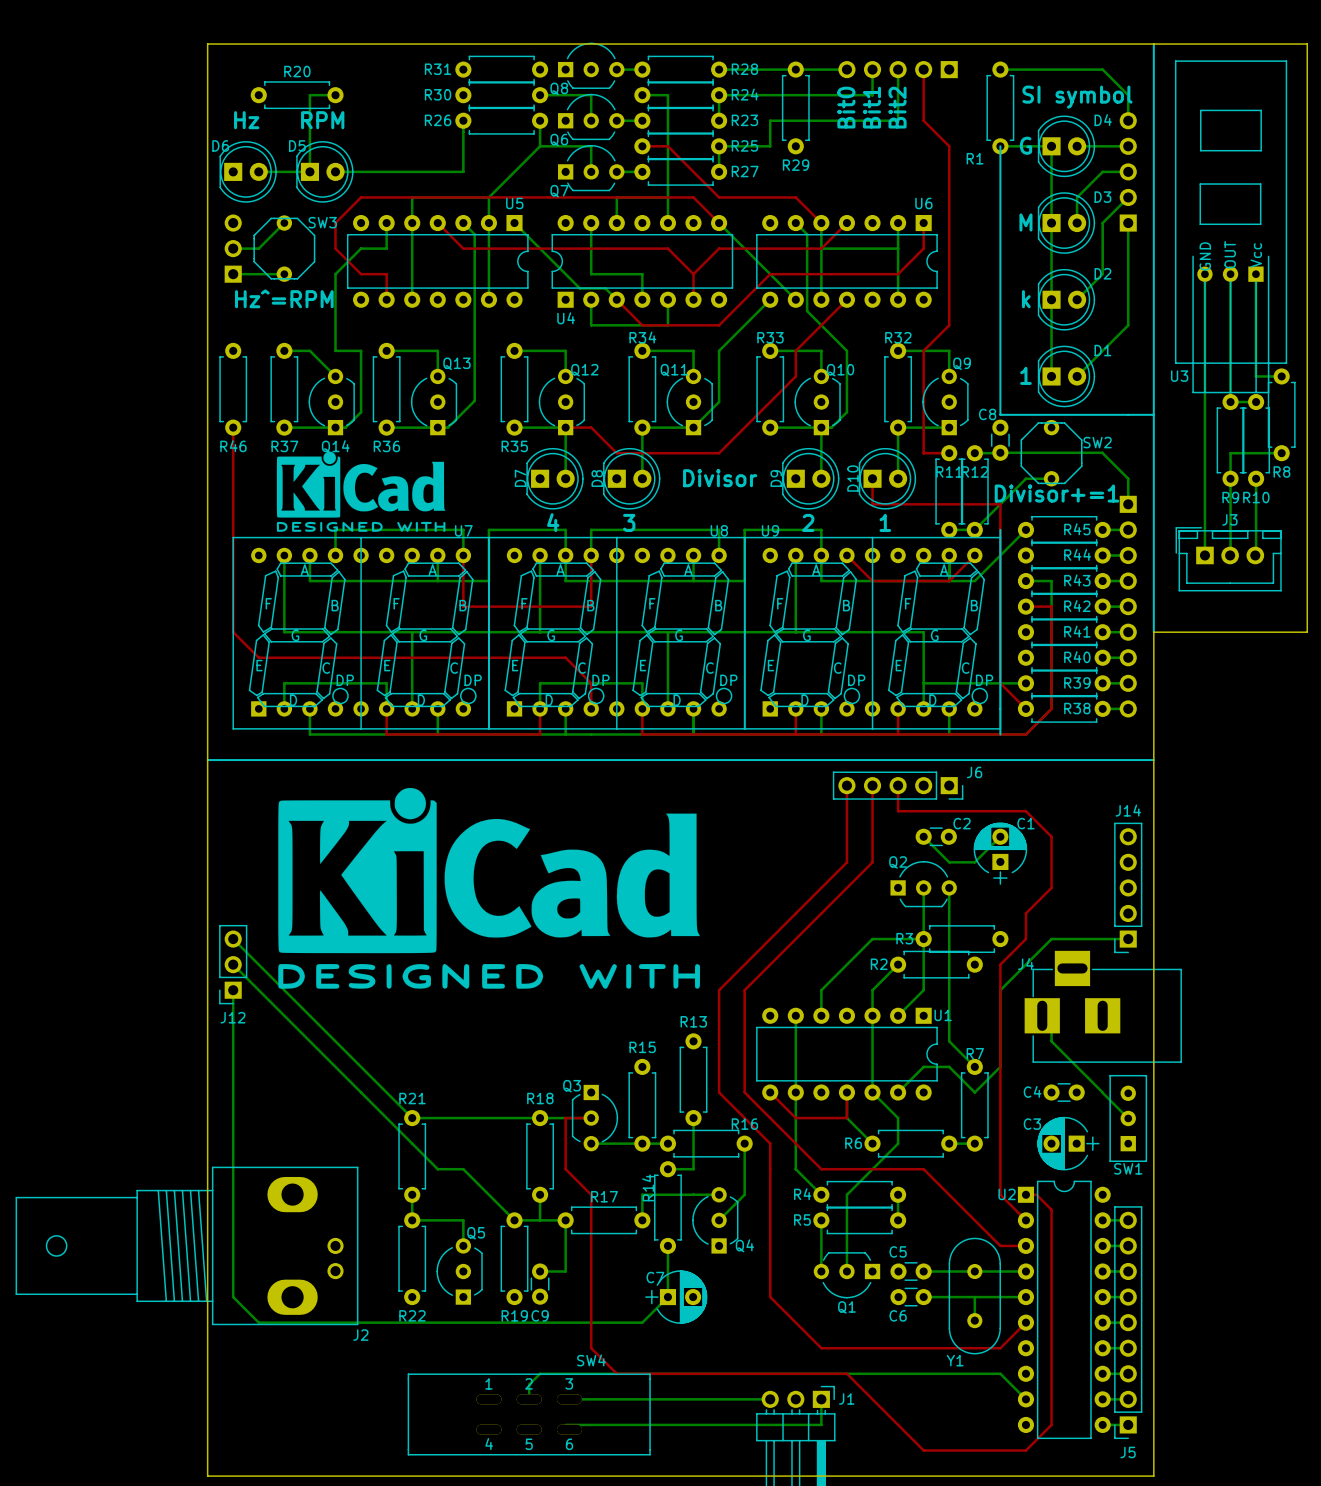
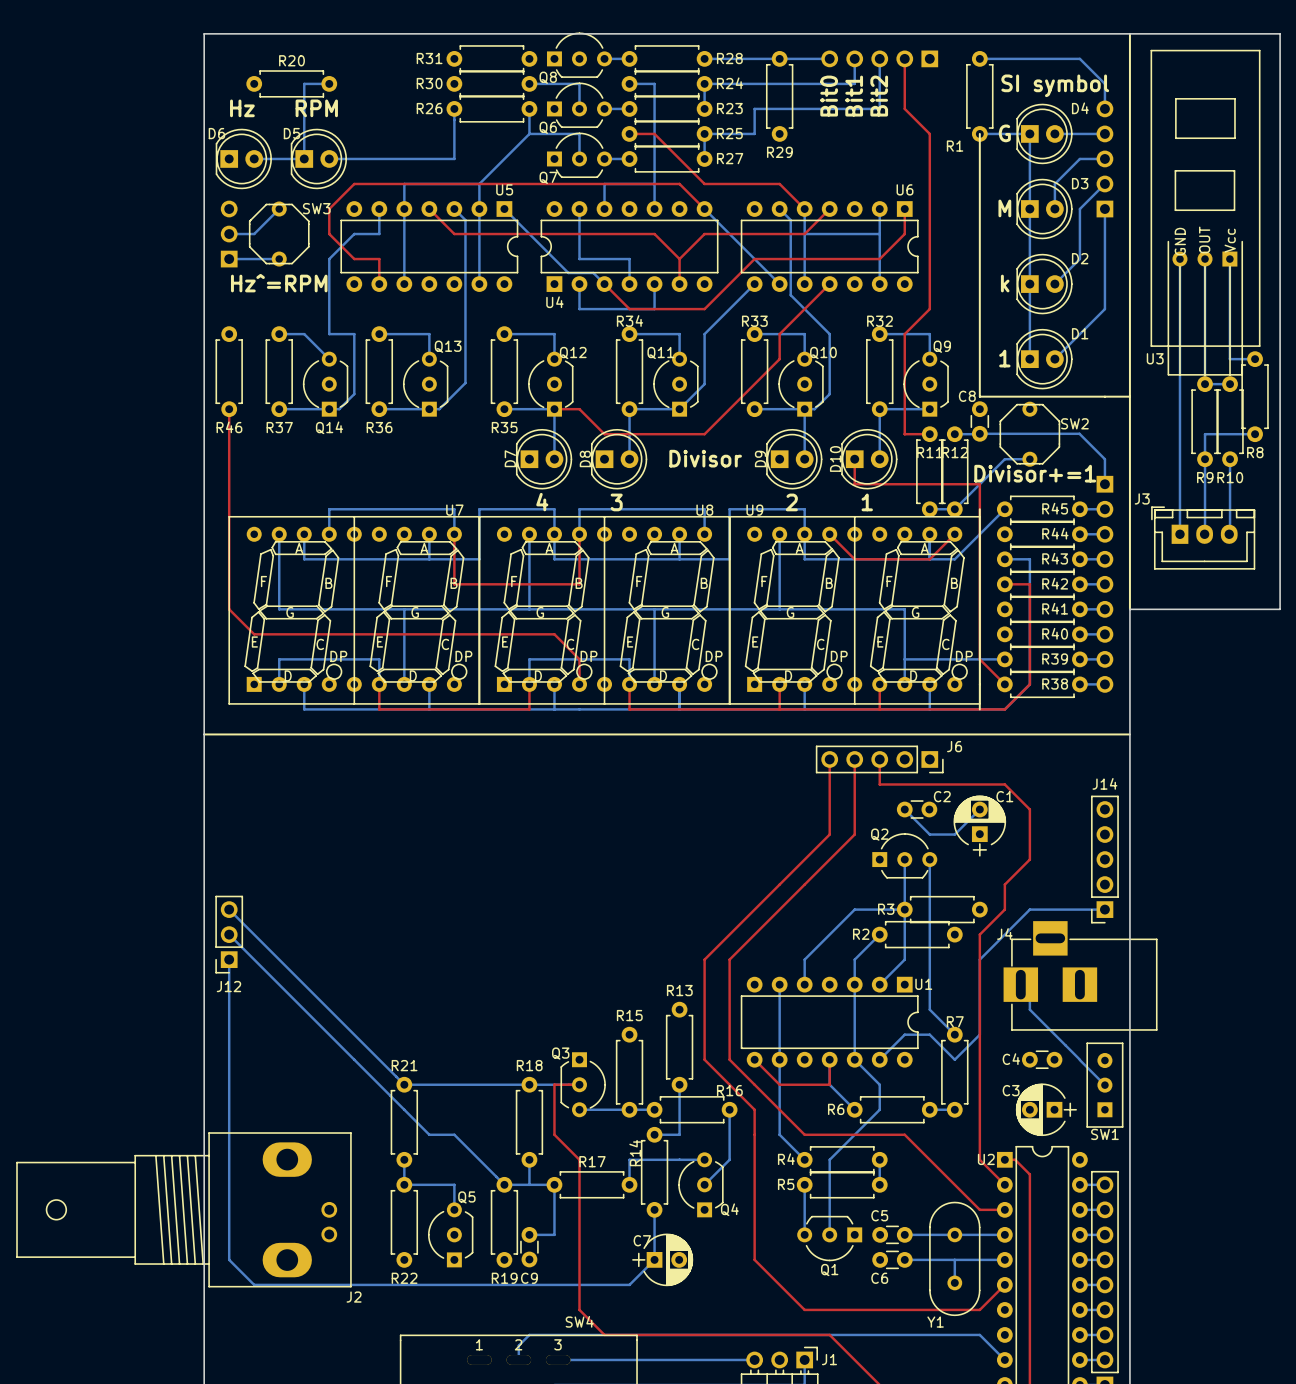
drawing: [276, 451, 446, 532] -> none
J3 name position: J3 (1229, 519) -> J3 (1142, 498)
J3 footprint: [1175, 527, 1282, 592] -> [1151, 506, 1256, 570]
drawing: [278, 787, 701, 989] -> none

